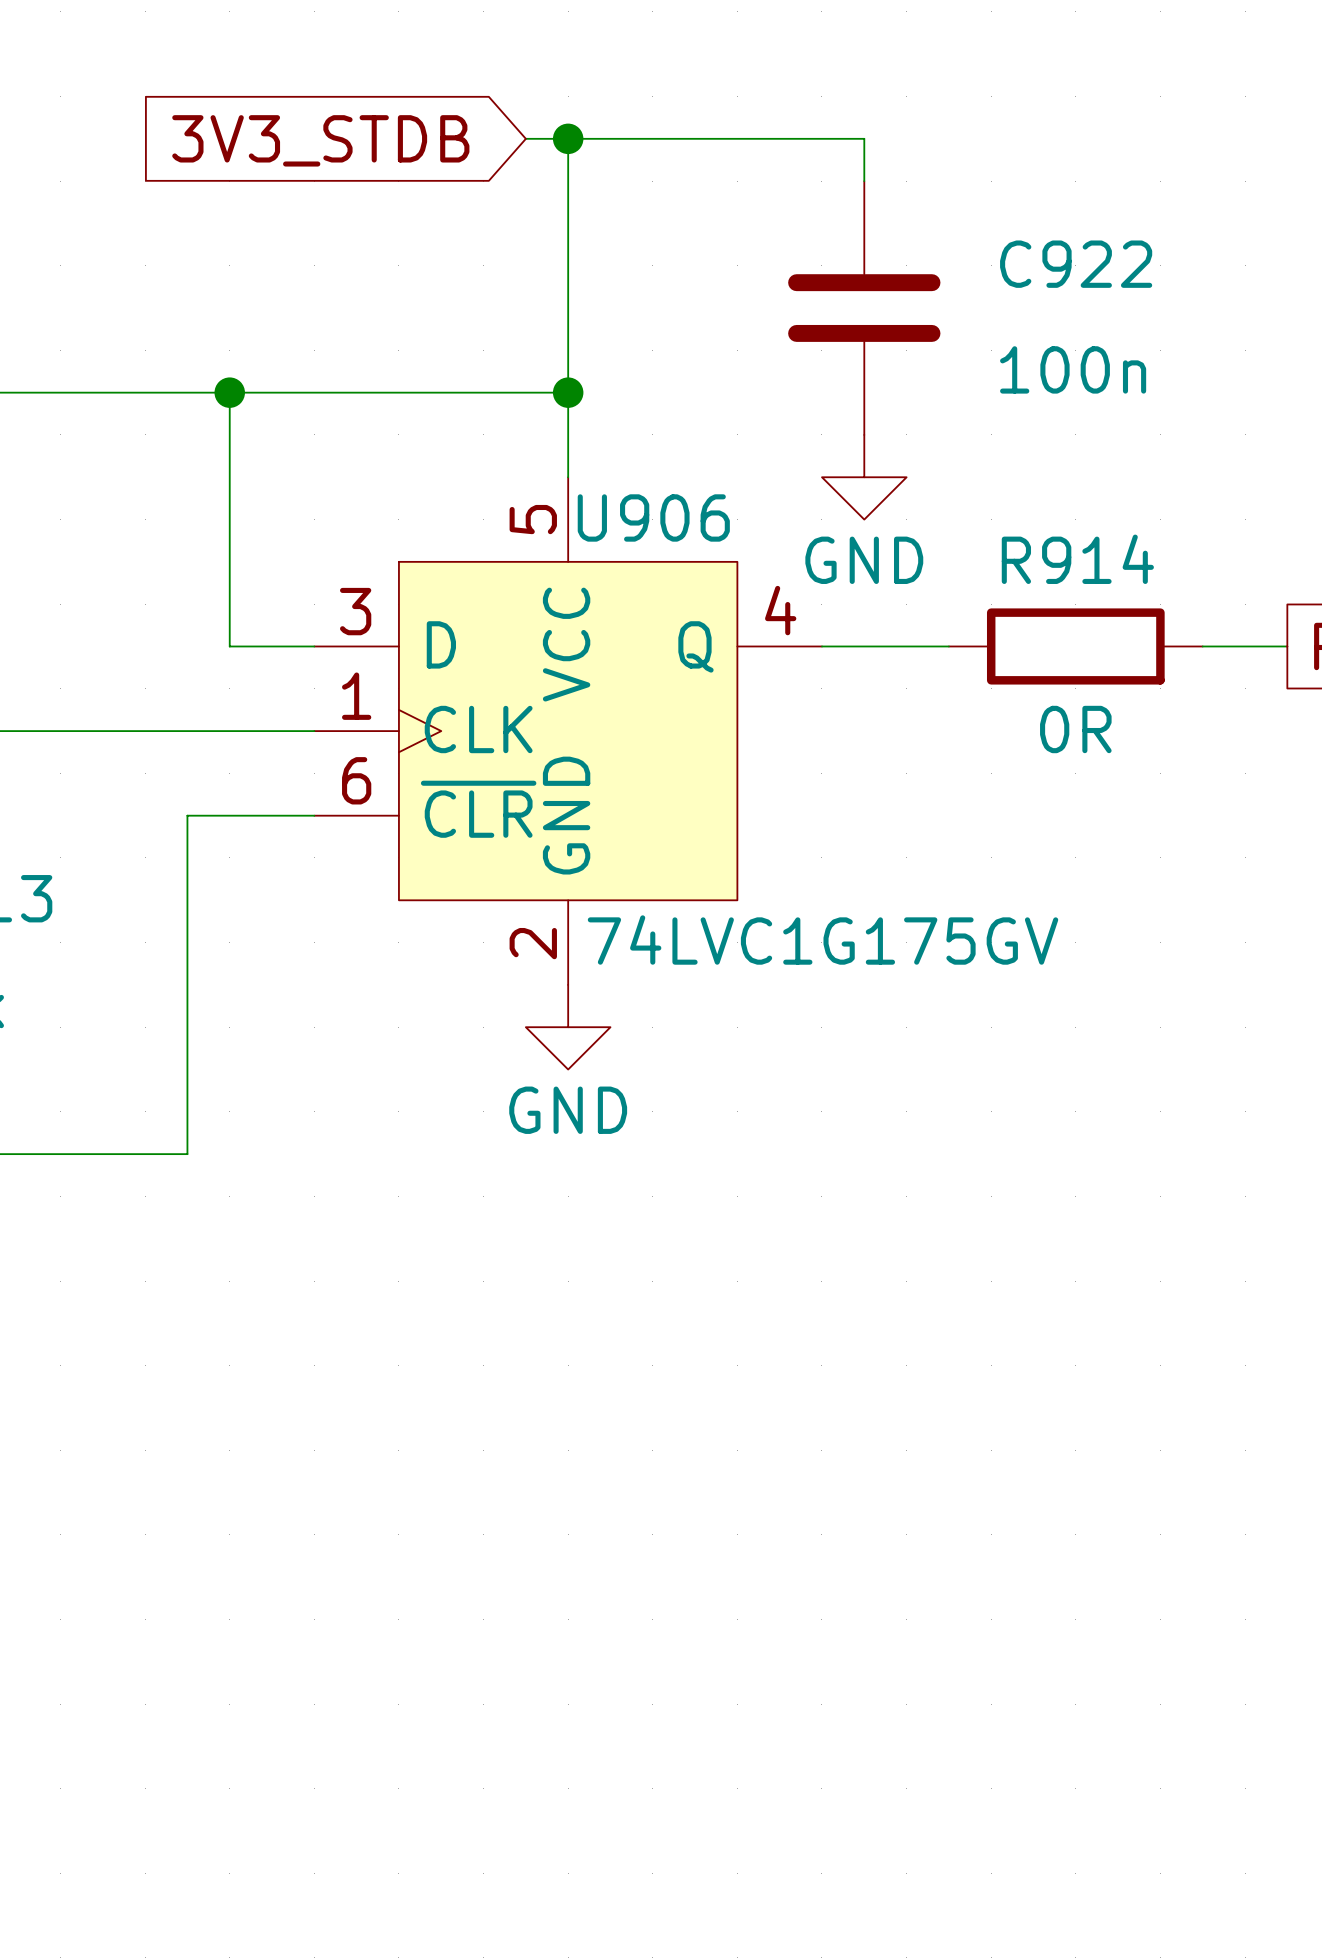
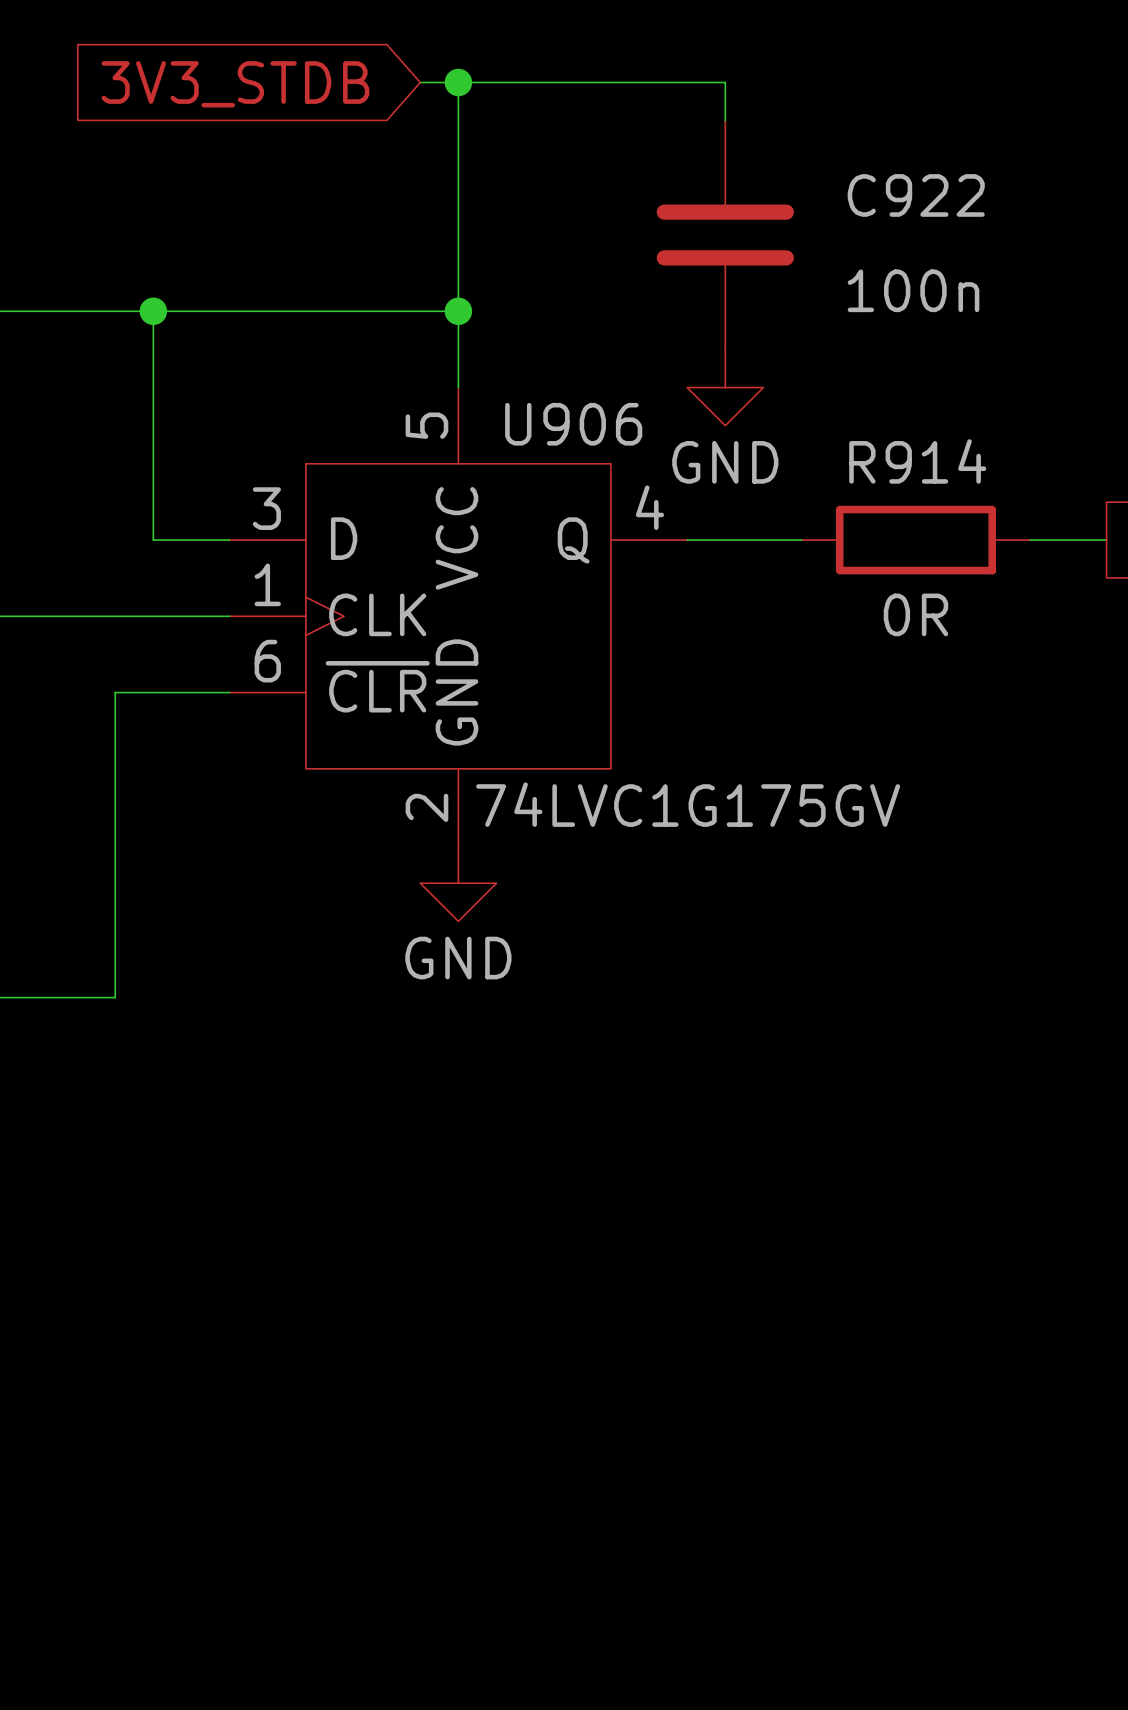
U906 name position: U906 (653, 517) -> U906 (573, 424)

